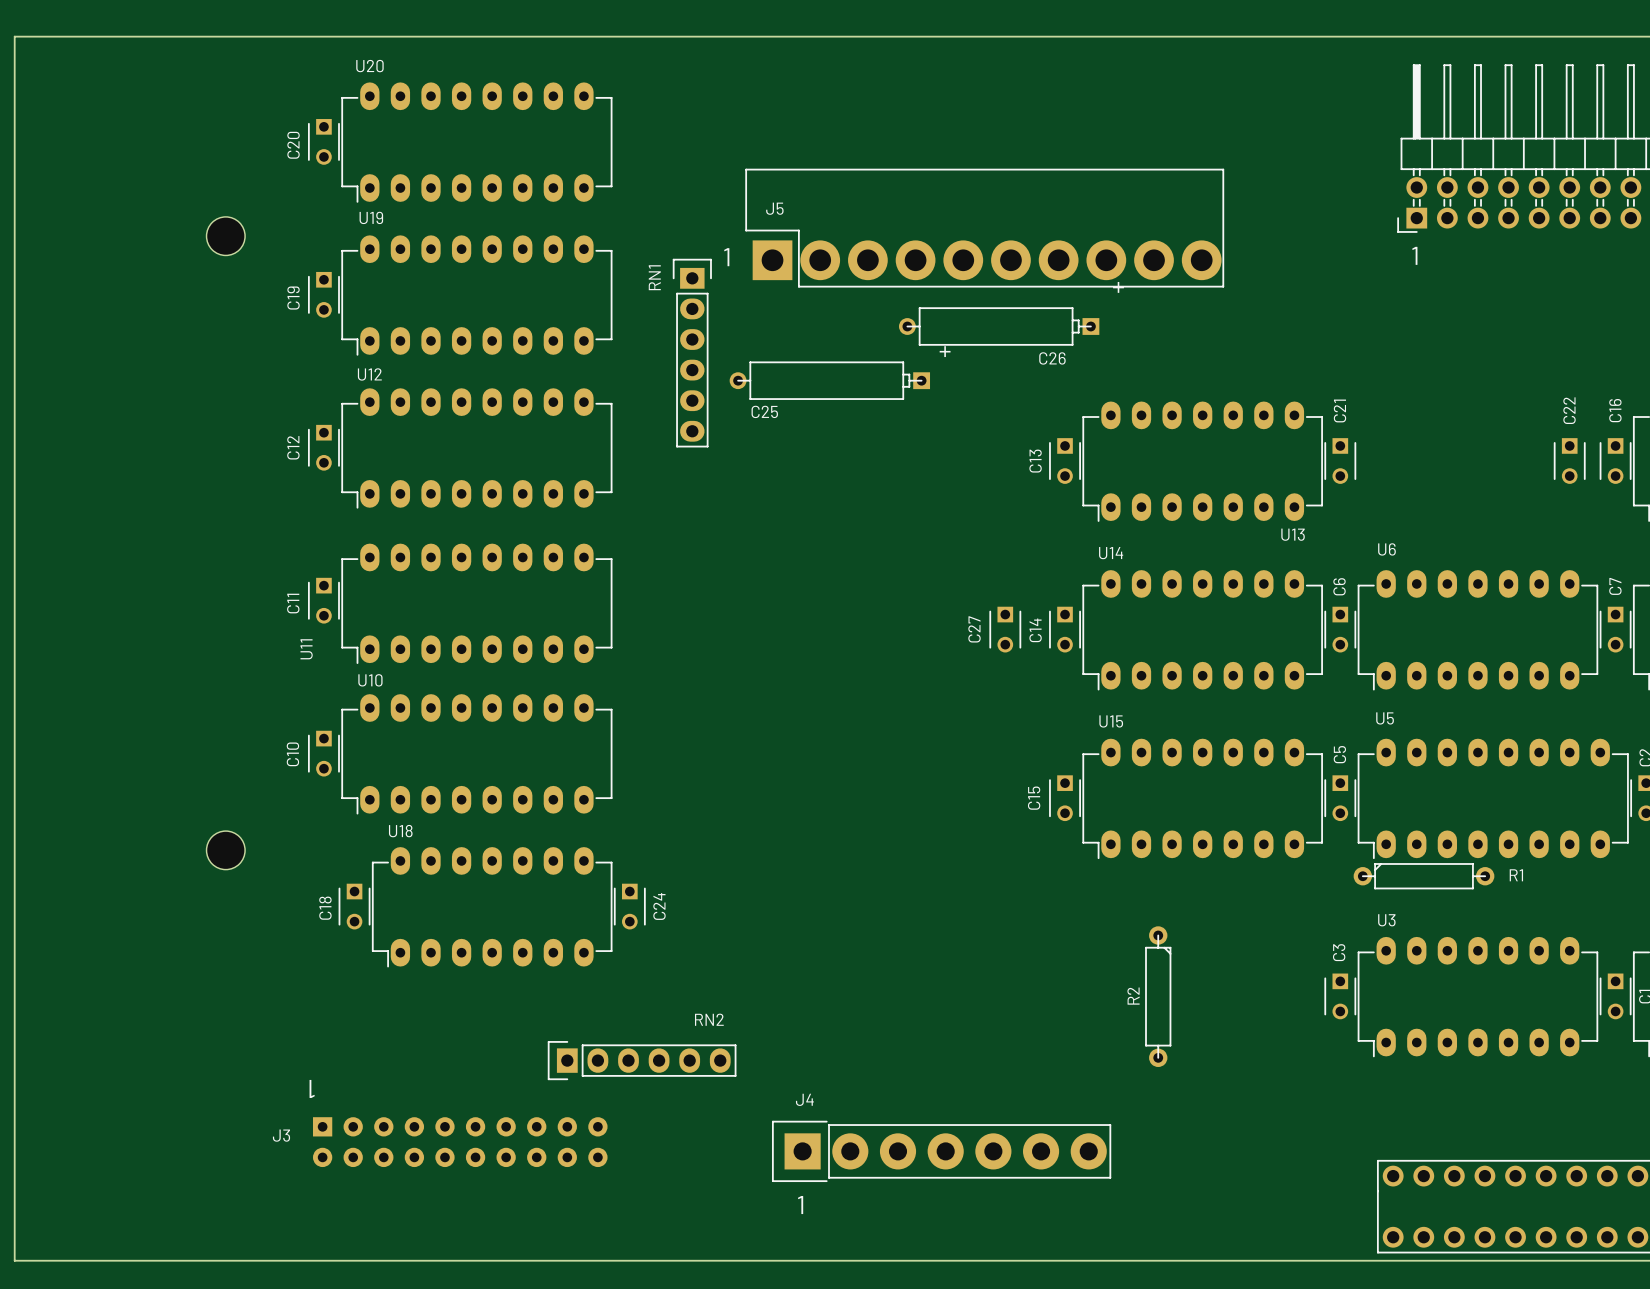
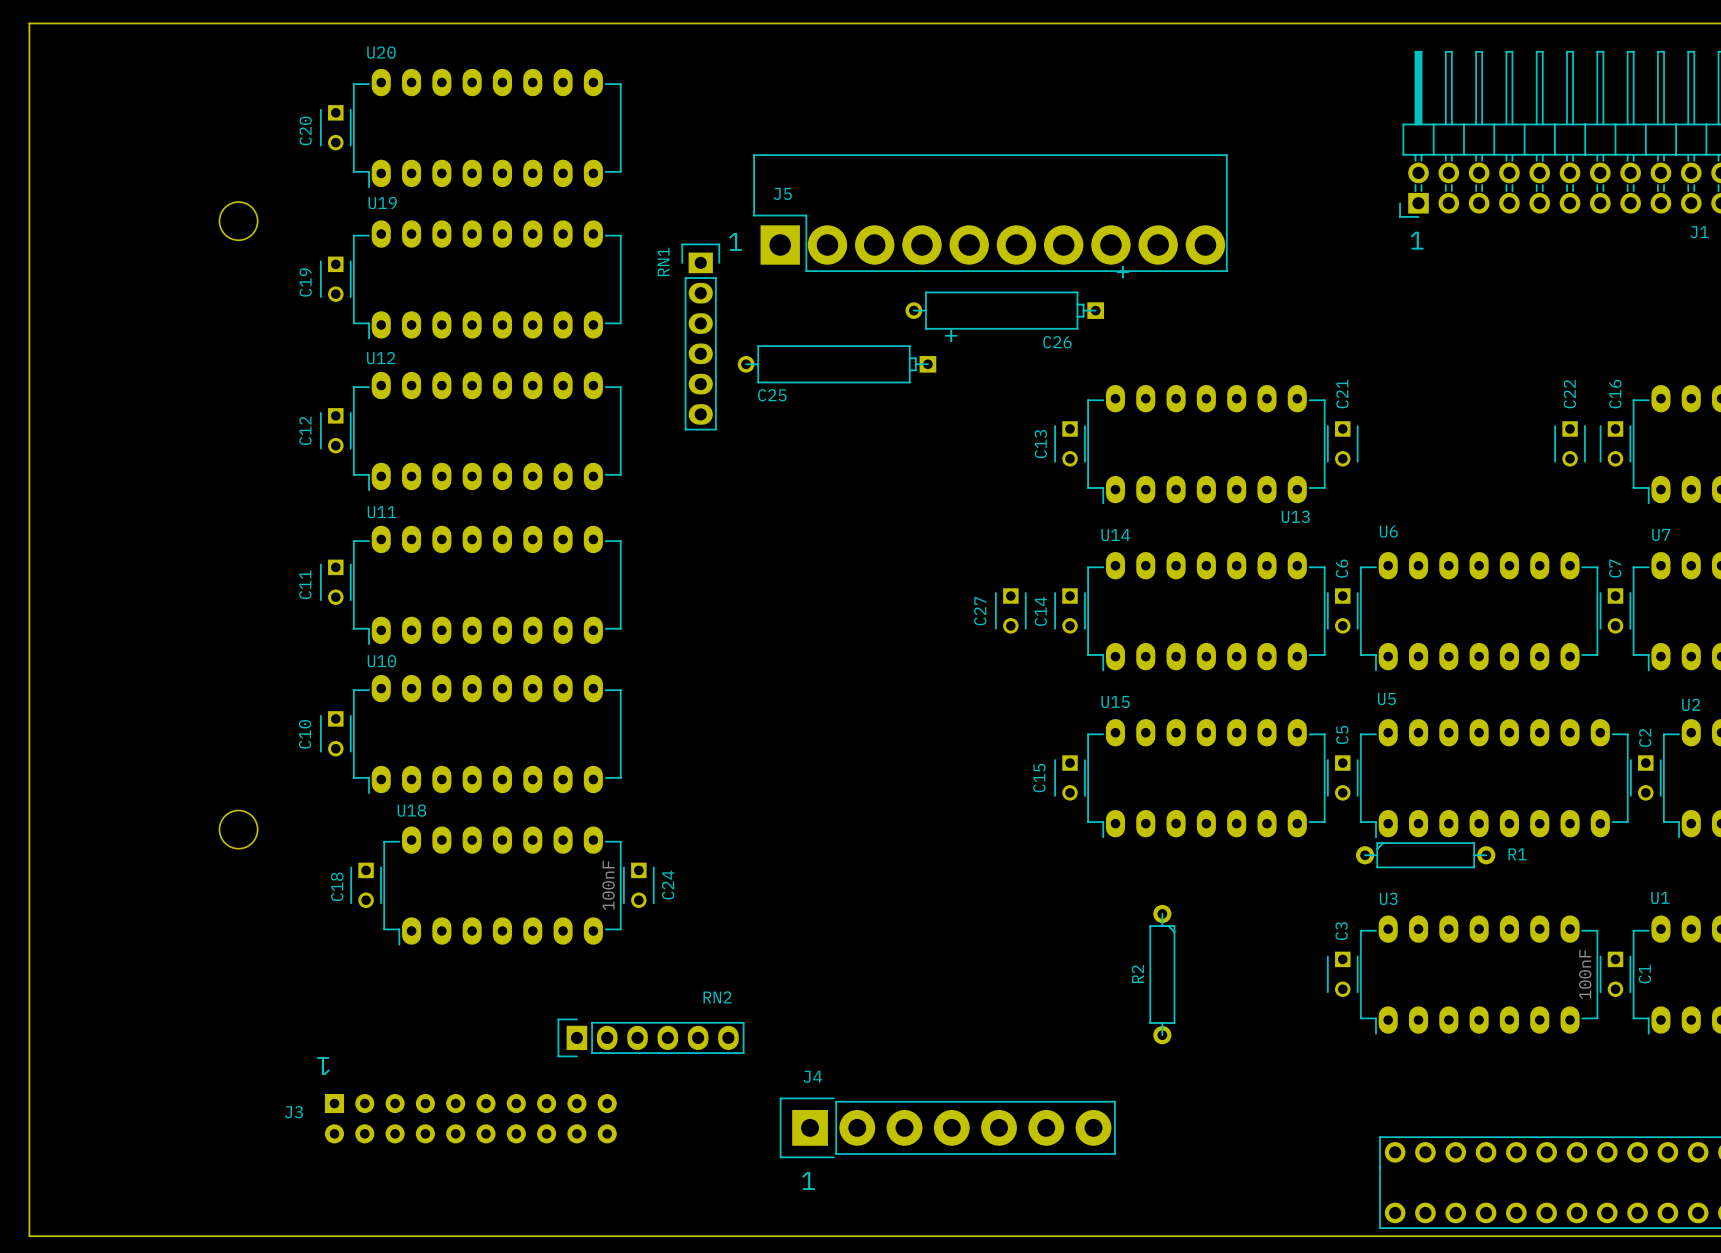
U11 name rotation: 0° (306, 649) -> 90° clockwise (382, 512)
U11 name position: U11 (306, 649) -> U11 (382, 512)
C24 value: none -> 100nF (608, 885)
C1 value: none -> 100nF (1585, 974)

